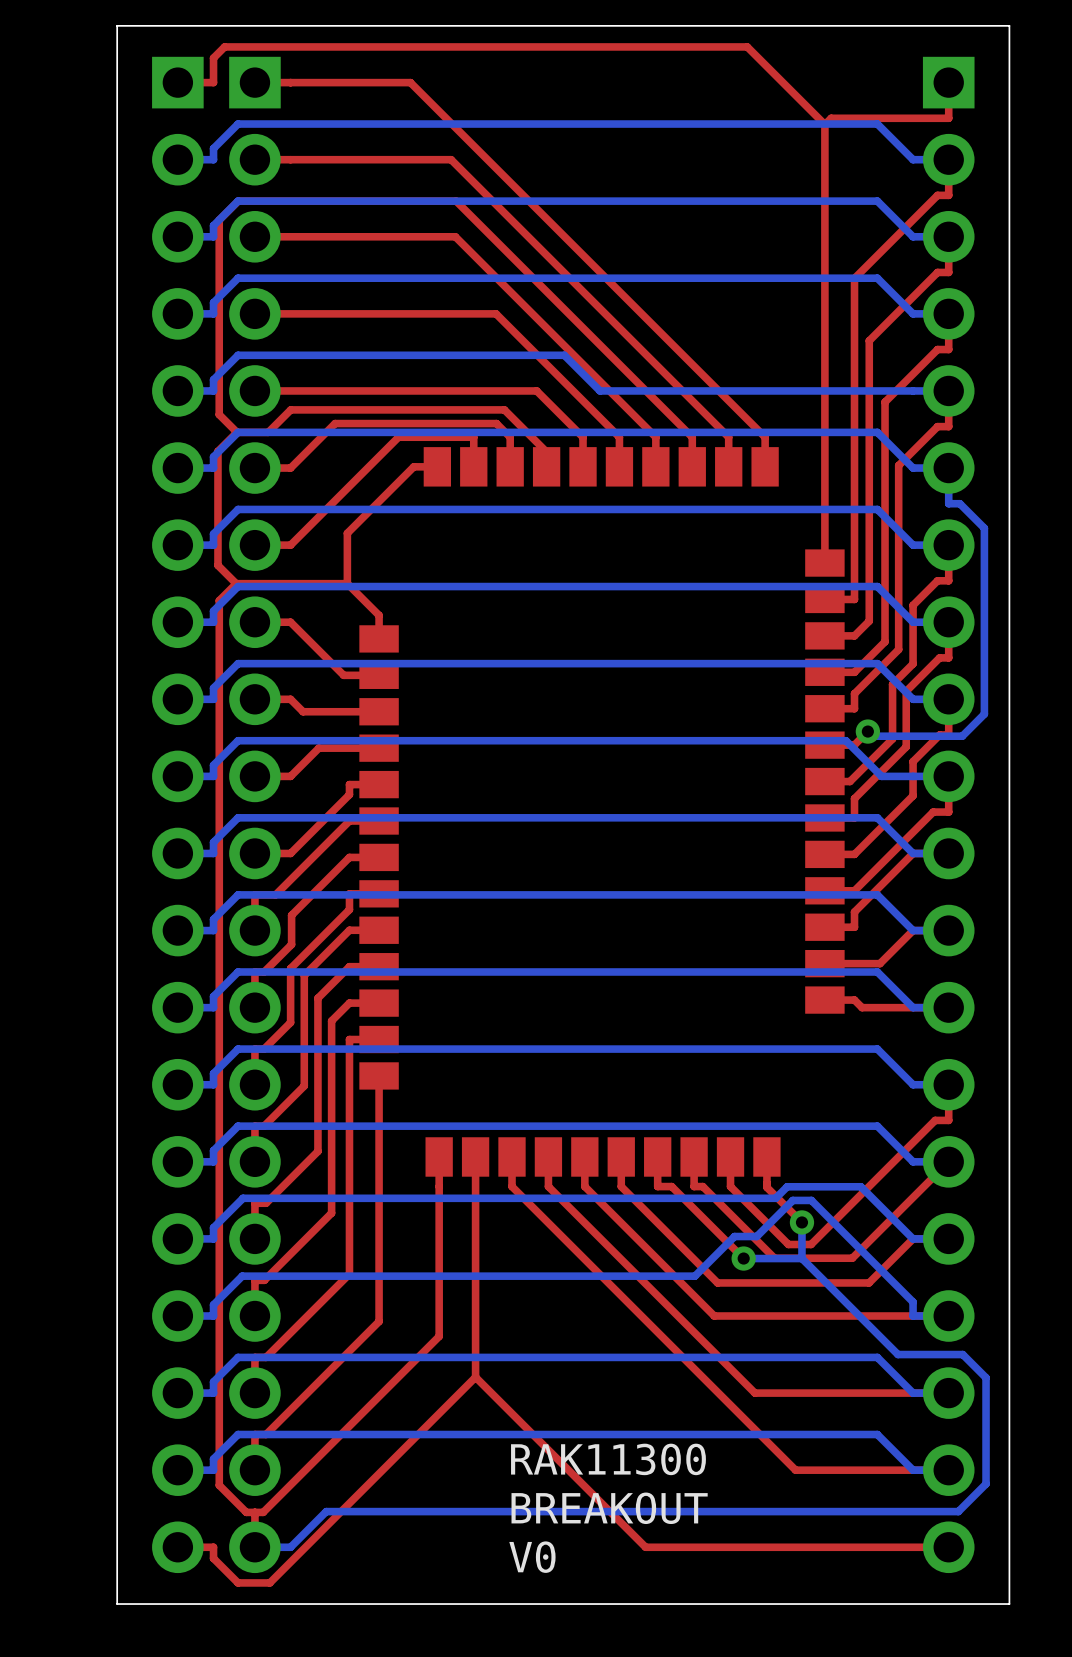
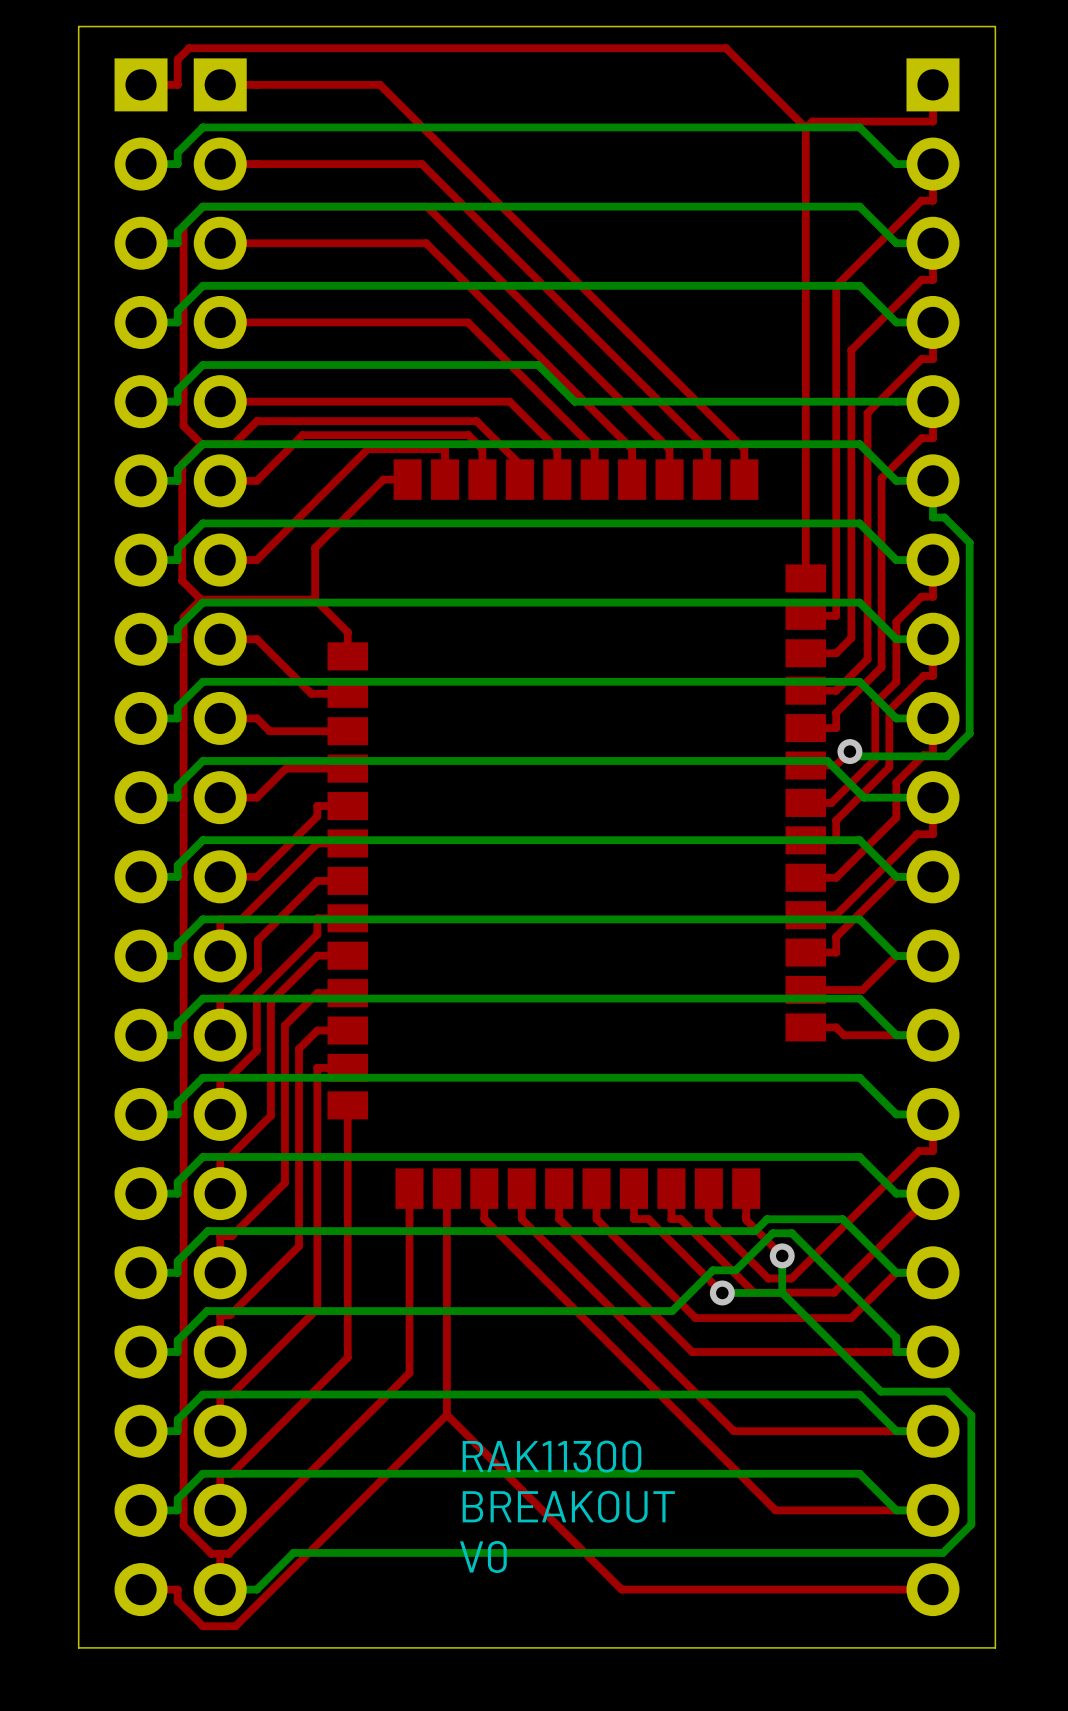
text: none -> RAK11300 (551, 1456)
text: RAK11300 (608, 1459) -> BREAKOUT (568, 1506)
text: BREAKOUT (609, 1508) -> V0 (483, 1556)
text: V0 (532, 1557) -> none

